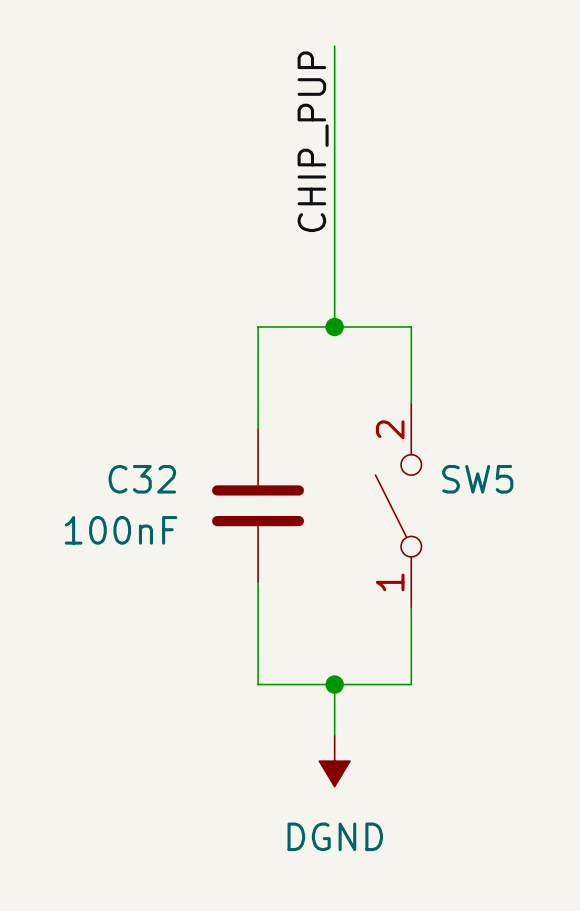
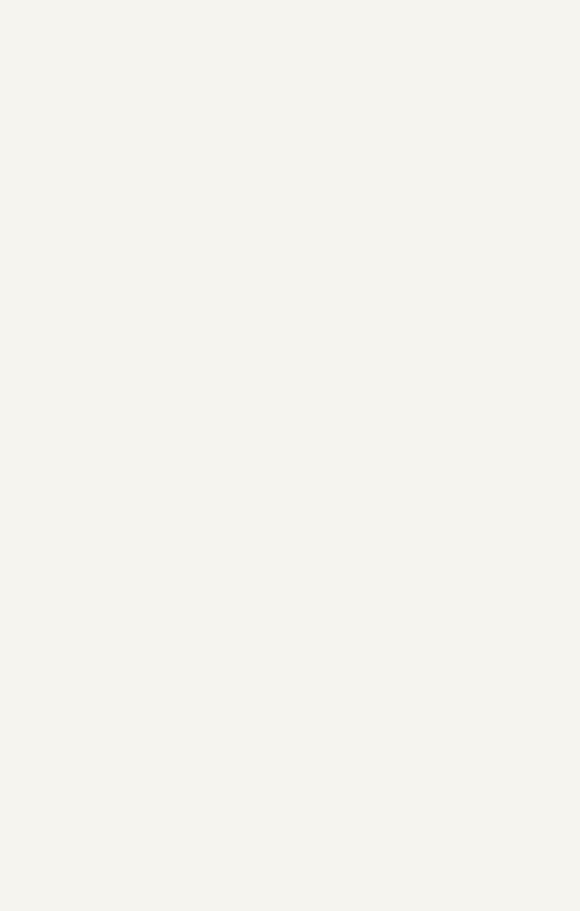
wire: (334, 46) (334, 327) -> none
label: CHIP_PUP (313, 141) -> none
junction: (334, 327) -> none
wire: (411, 403) (411, 327) (258, 327) (258, 429) -> none
C32: 100nF (258, 505) -> none
SW5: (398, 505) -> none
wire: (258, 582) (258, 684) (411, 684) (411, 607) -> none
wire: (334, 684) (334, 735) -> none
junction: (334, 684) -> none
power symbol: DGND (334, 761) -> none

